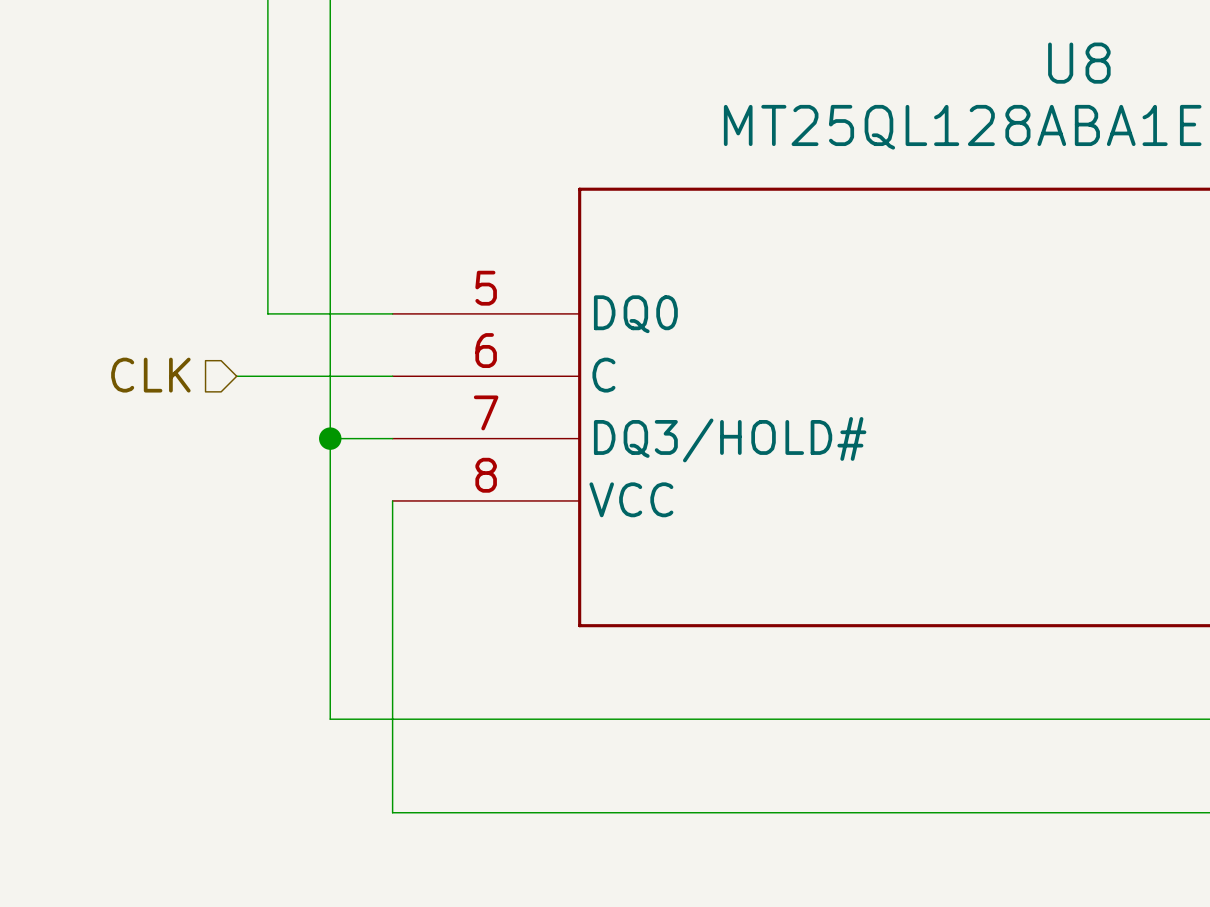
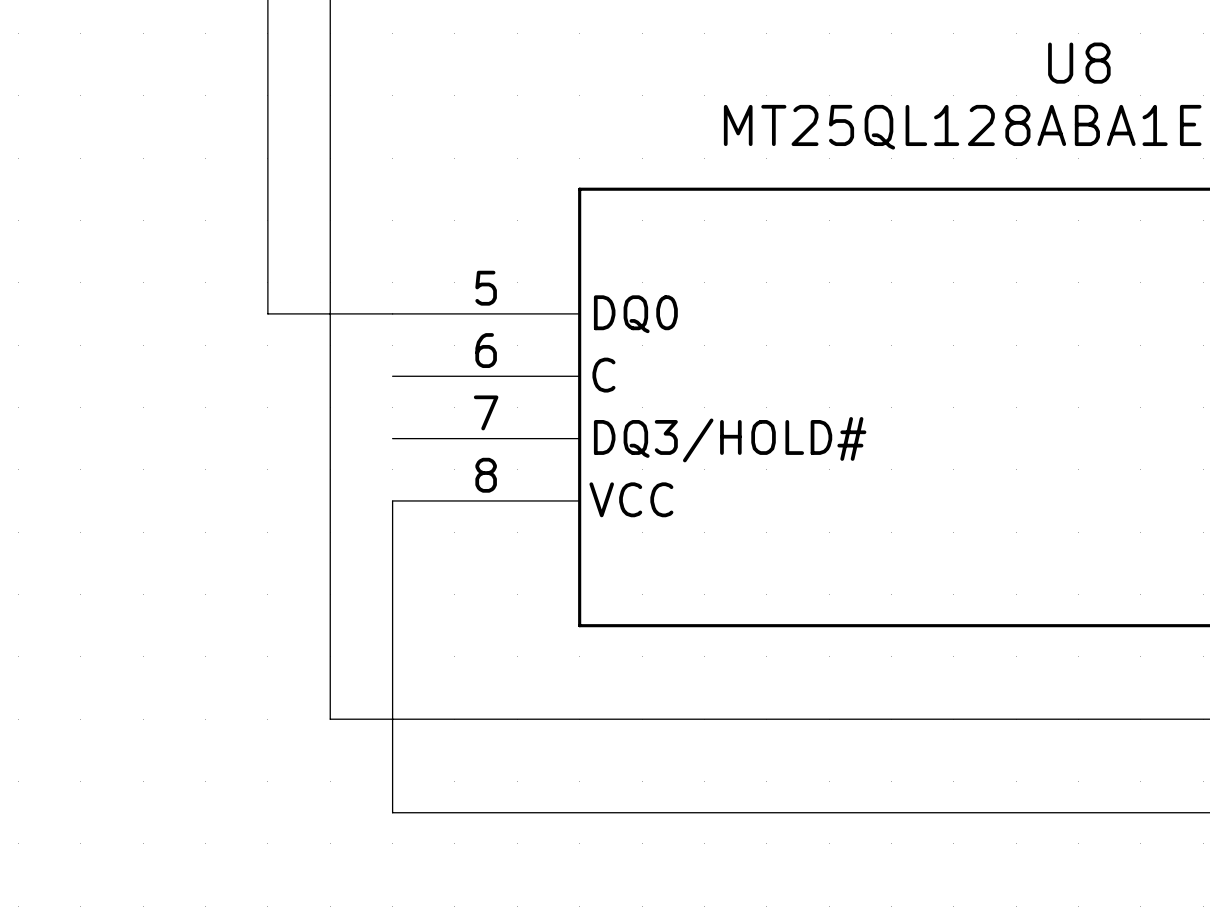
hierarchical label: CLK (150, 375) -> none
wire: (236, 376) (392, 376) -> none
wire: (330, 438) (392, 438) -> none
junction: (330, 438) -> none

